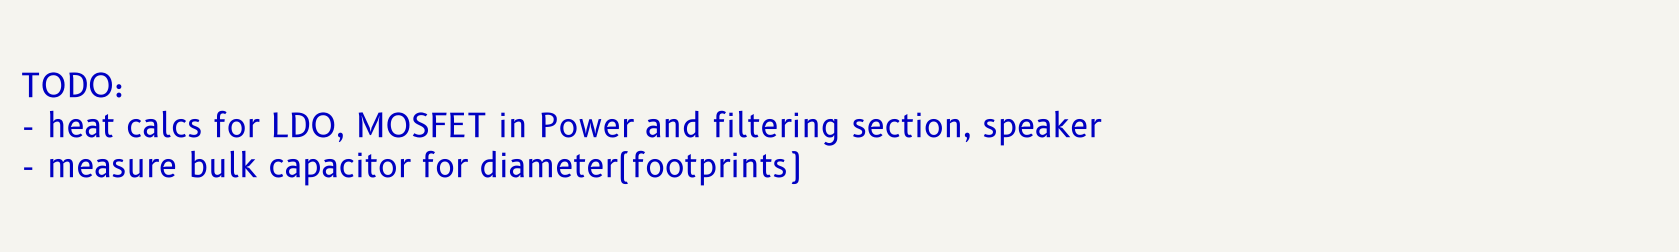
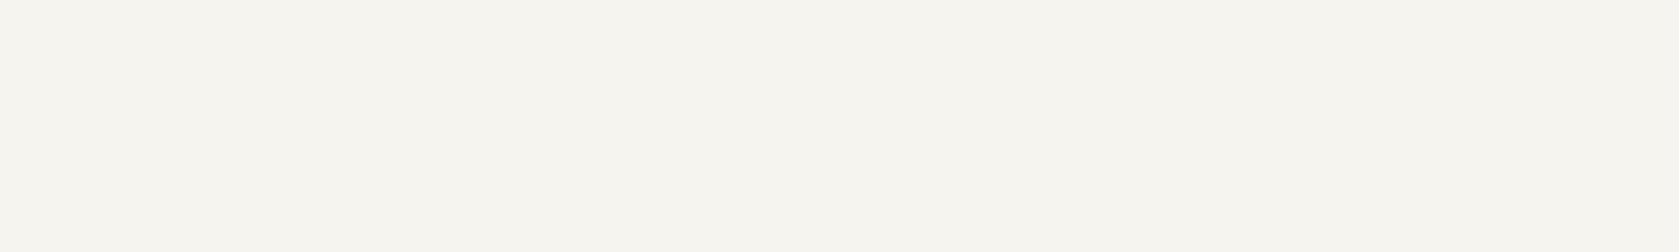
text: TODO: (71, 84) -> none
text: - heat calcs for LDO, MOSFET in Power and filtering section, speaker (562, 128) -> none
text: - measure bulk capacitor for diameter(footprints) (411, 168) -> none

